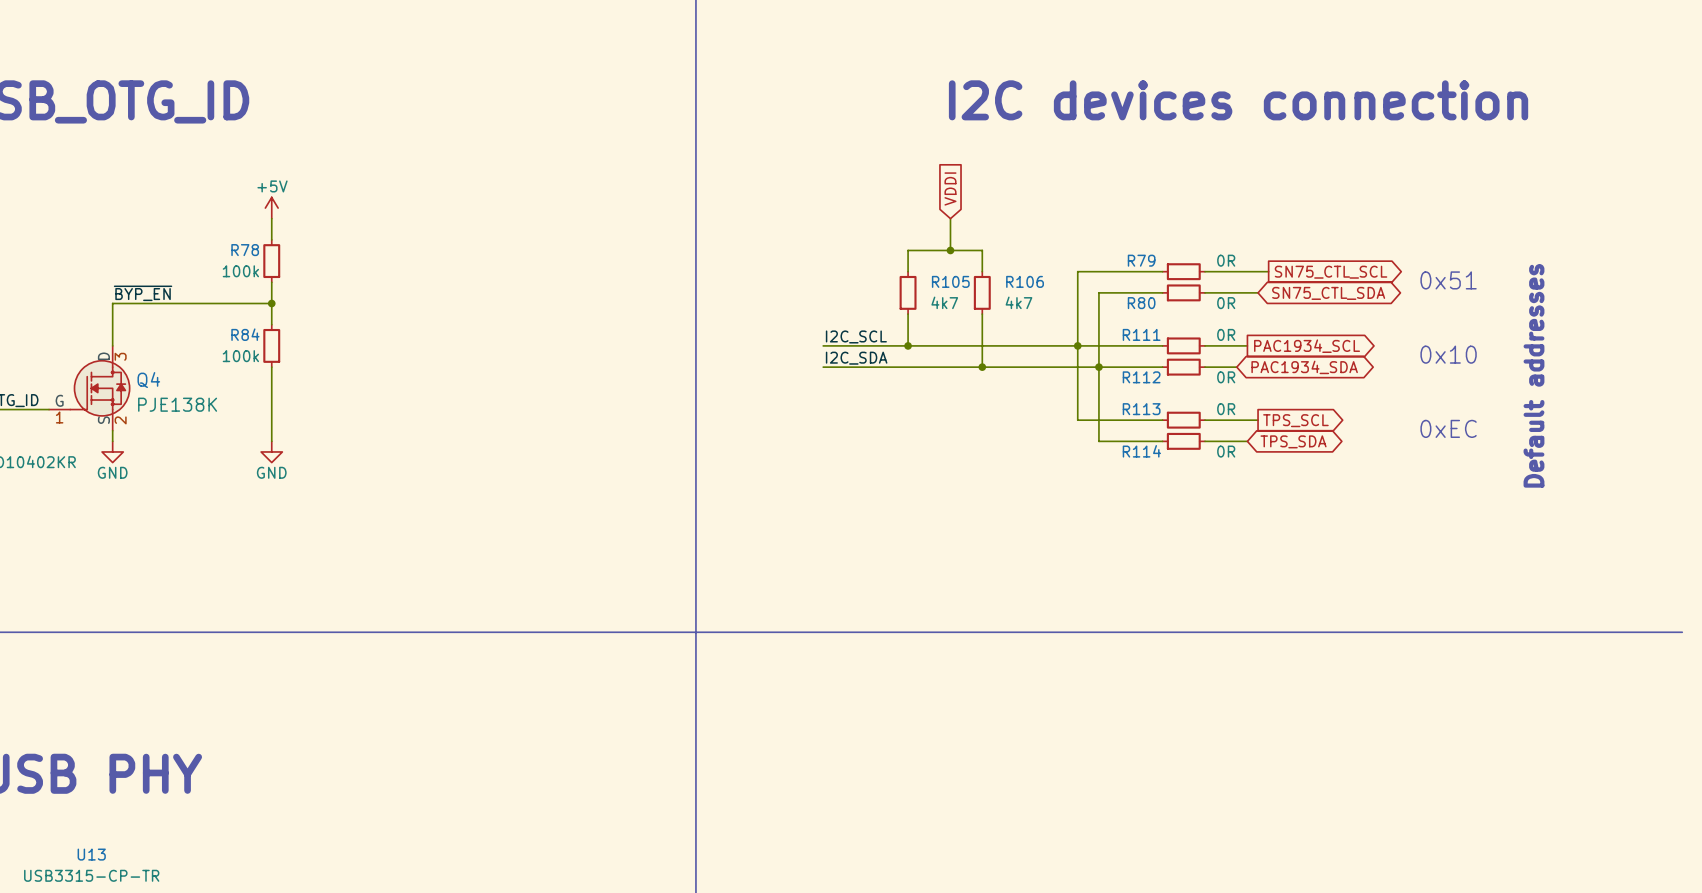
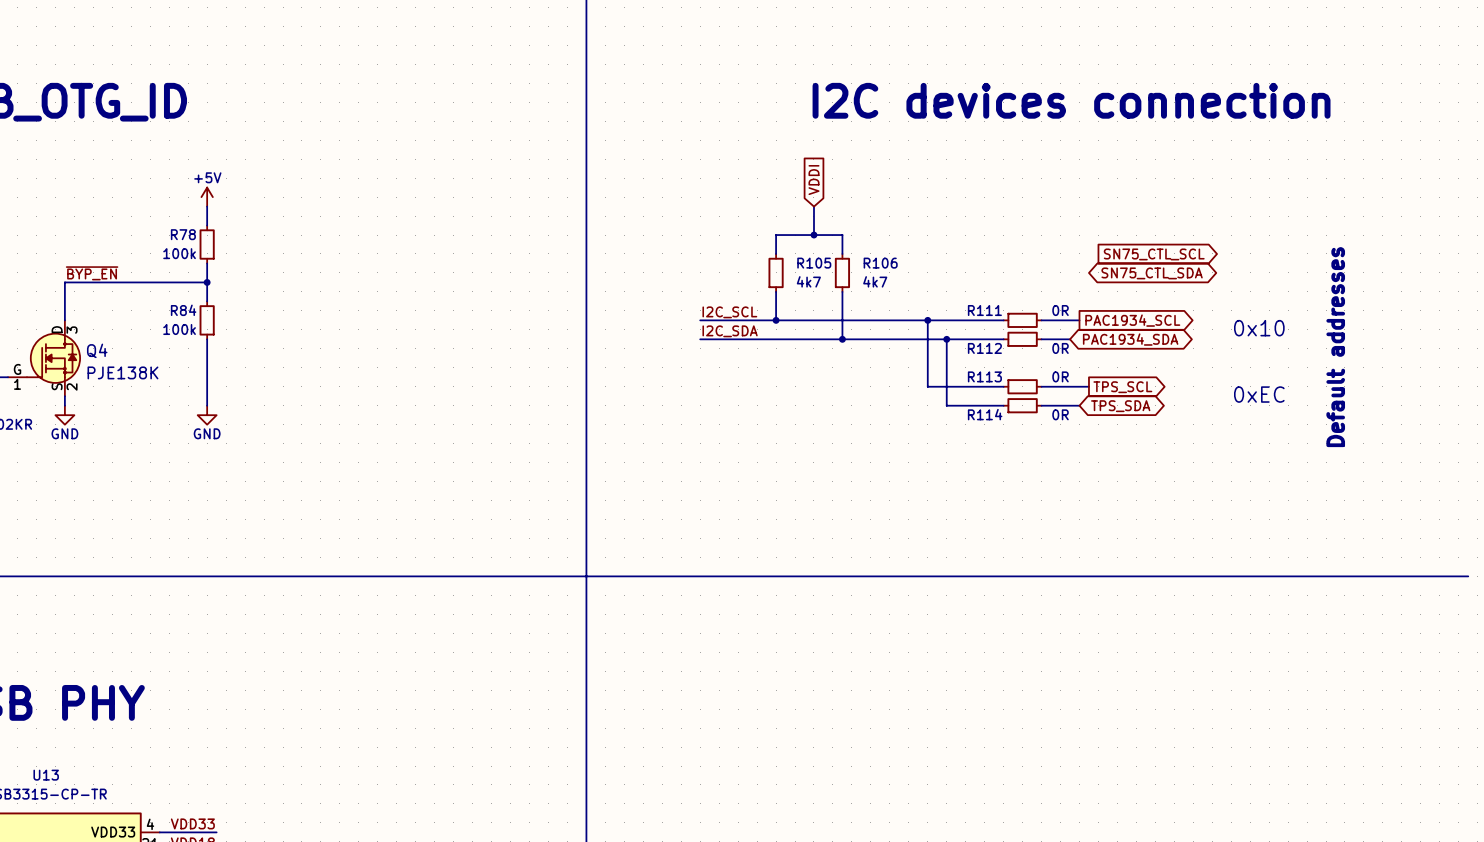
wire: (1162, 271) (1077, 271) (1077, 345) -> none
R79: (1183, 271) -> none
wire: (1205, 271) (1268, 271) -> none
text: 0x51 (1448, 280) -> none
wire: (1162, 292) (1098, 292) (1098, 367) -> none
R80: (1183, 292) -> none
wire: (1205, 292) (1258, 292) -> none

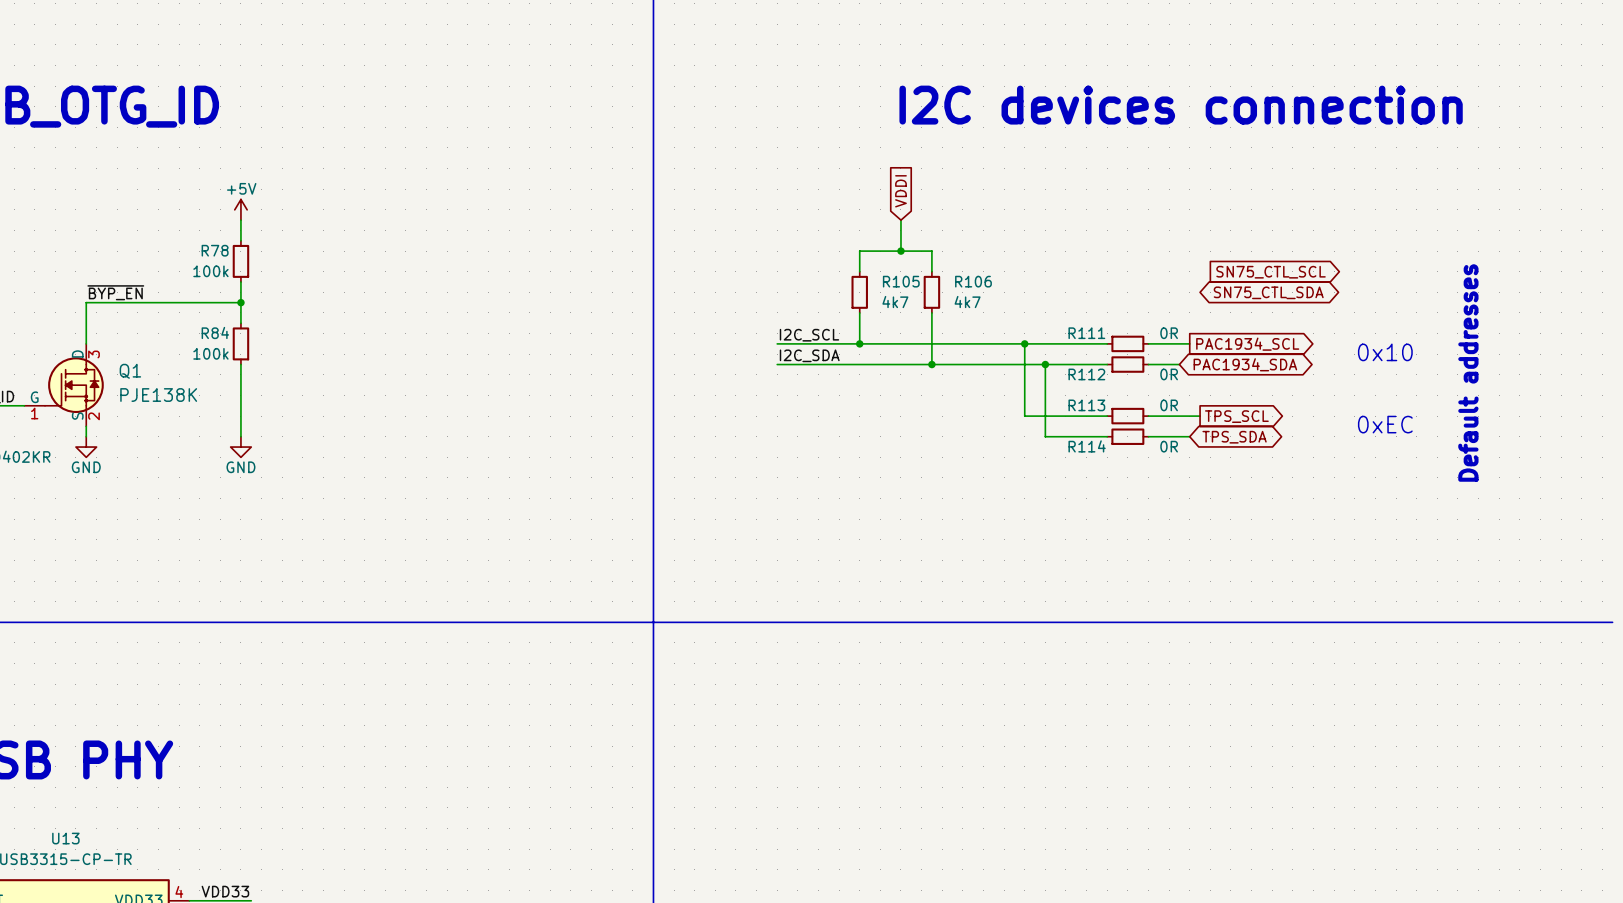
Q4: PJE138K (44, 358) -> none
Q1: none -> PJE138K (64, 385)

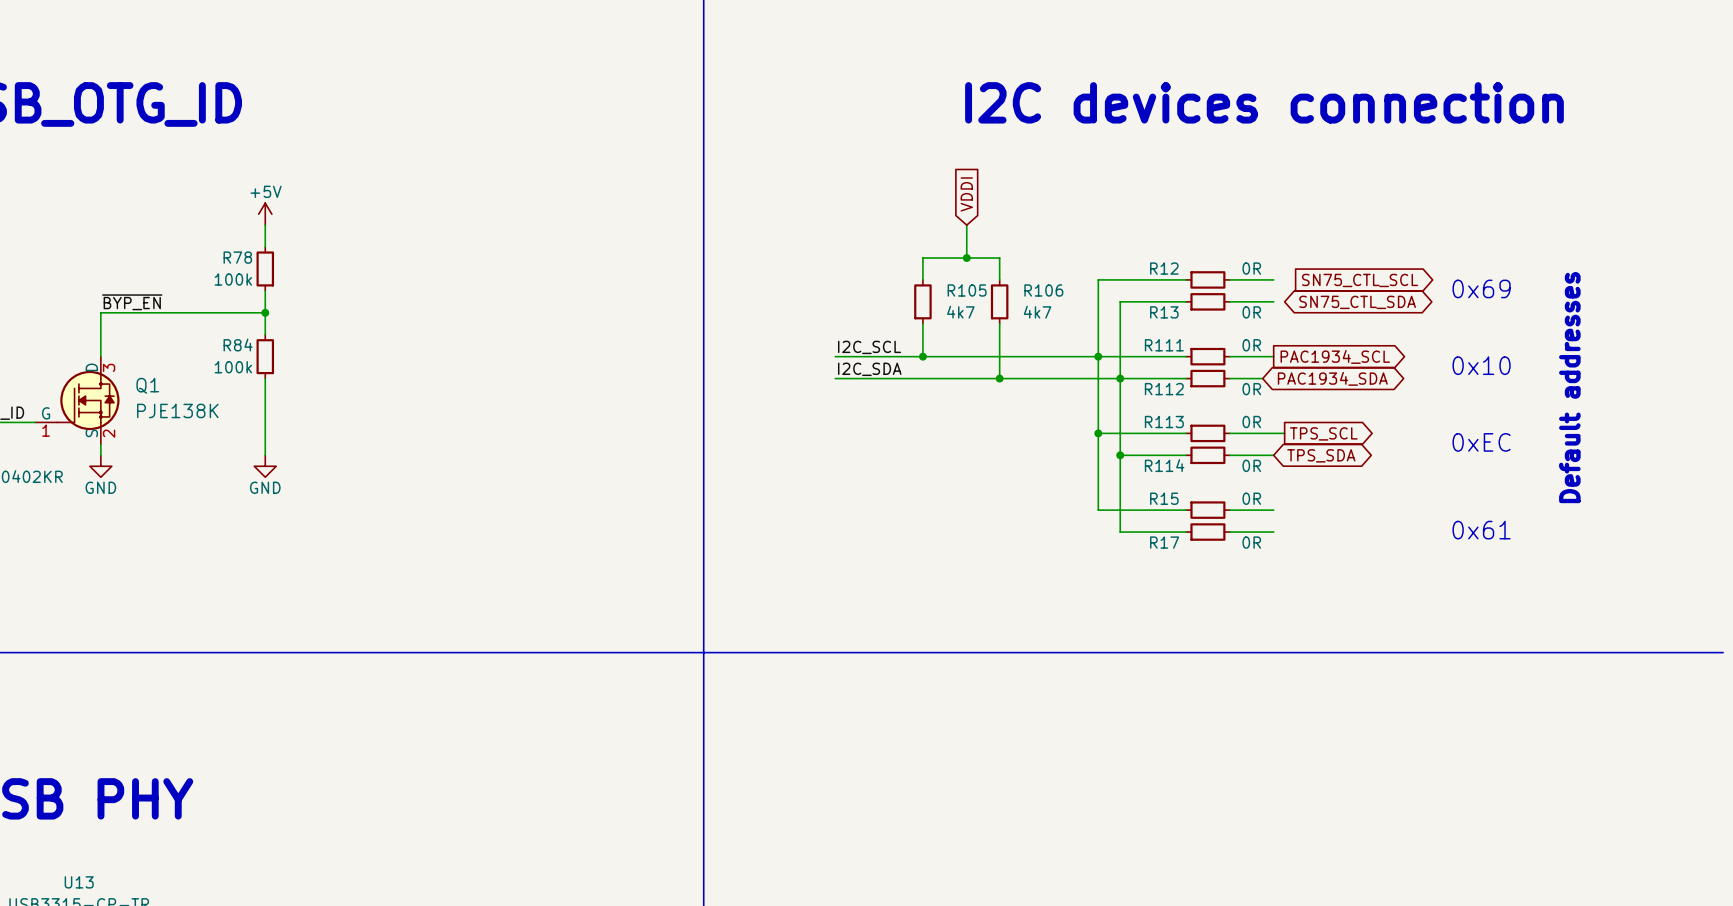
wire: none -> (1186, 279) (1098, 279) (1098, 356)
R12: none -> (1207, 279)
wire: none -> (1229, 279) (1273, 279)
text: none -> 0x69 (1481, 288)
wire: none -> (1186, 301) (1120, 301) (1120, 378)
R13: none -> (1207, 301)
wire: none -> (1229, 301) (1273, 301)
wire: none -> (1098, 433) (1098, 510) (1186, 510)
junction: none -> (1098, 433)
wire: none -> (1120, 455) (1120, 532) (1186, 532)
junction: none -> (1120, 455)
R15: none -> (1207, 510)
wire: none -> (1229, 510) (1273, 510)
text: none -> 0x61 (1481, 530)
R17: none -> (1207, 532)
wire: none -> (1229, 532) (1273, 532)

